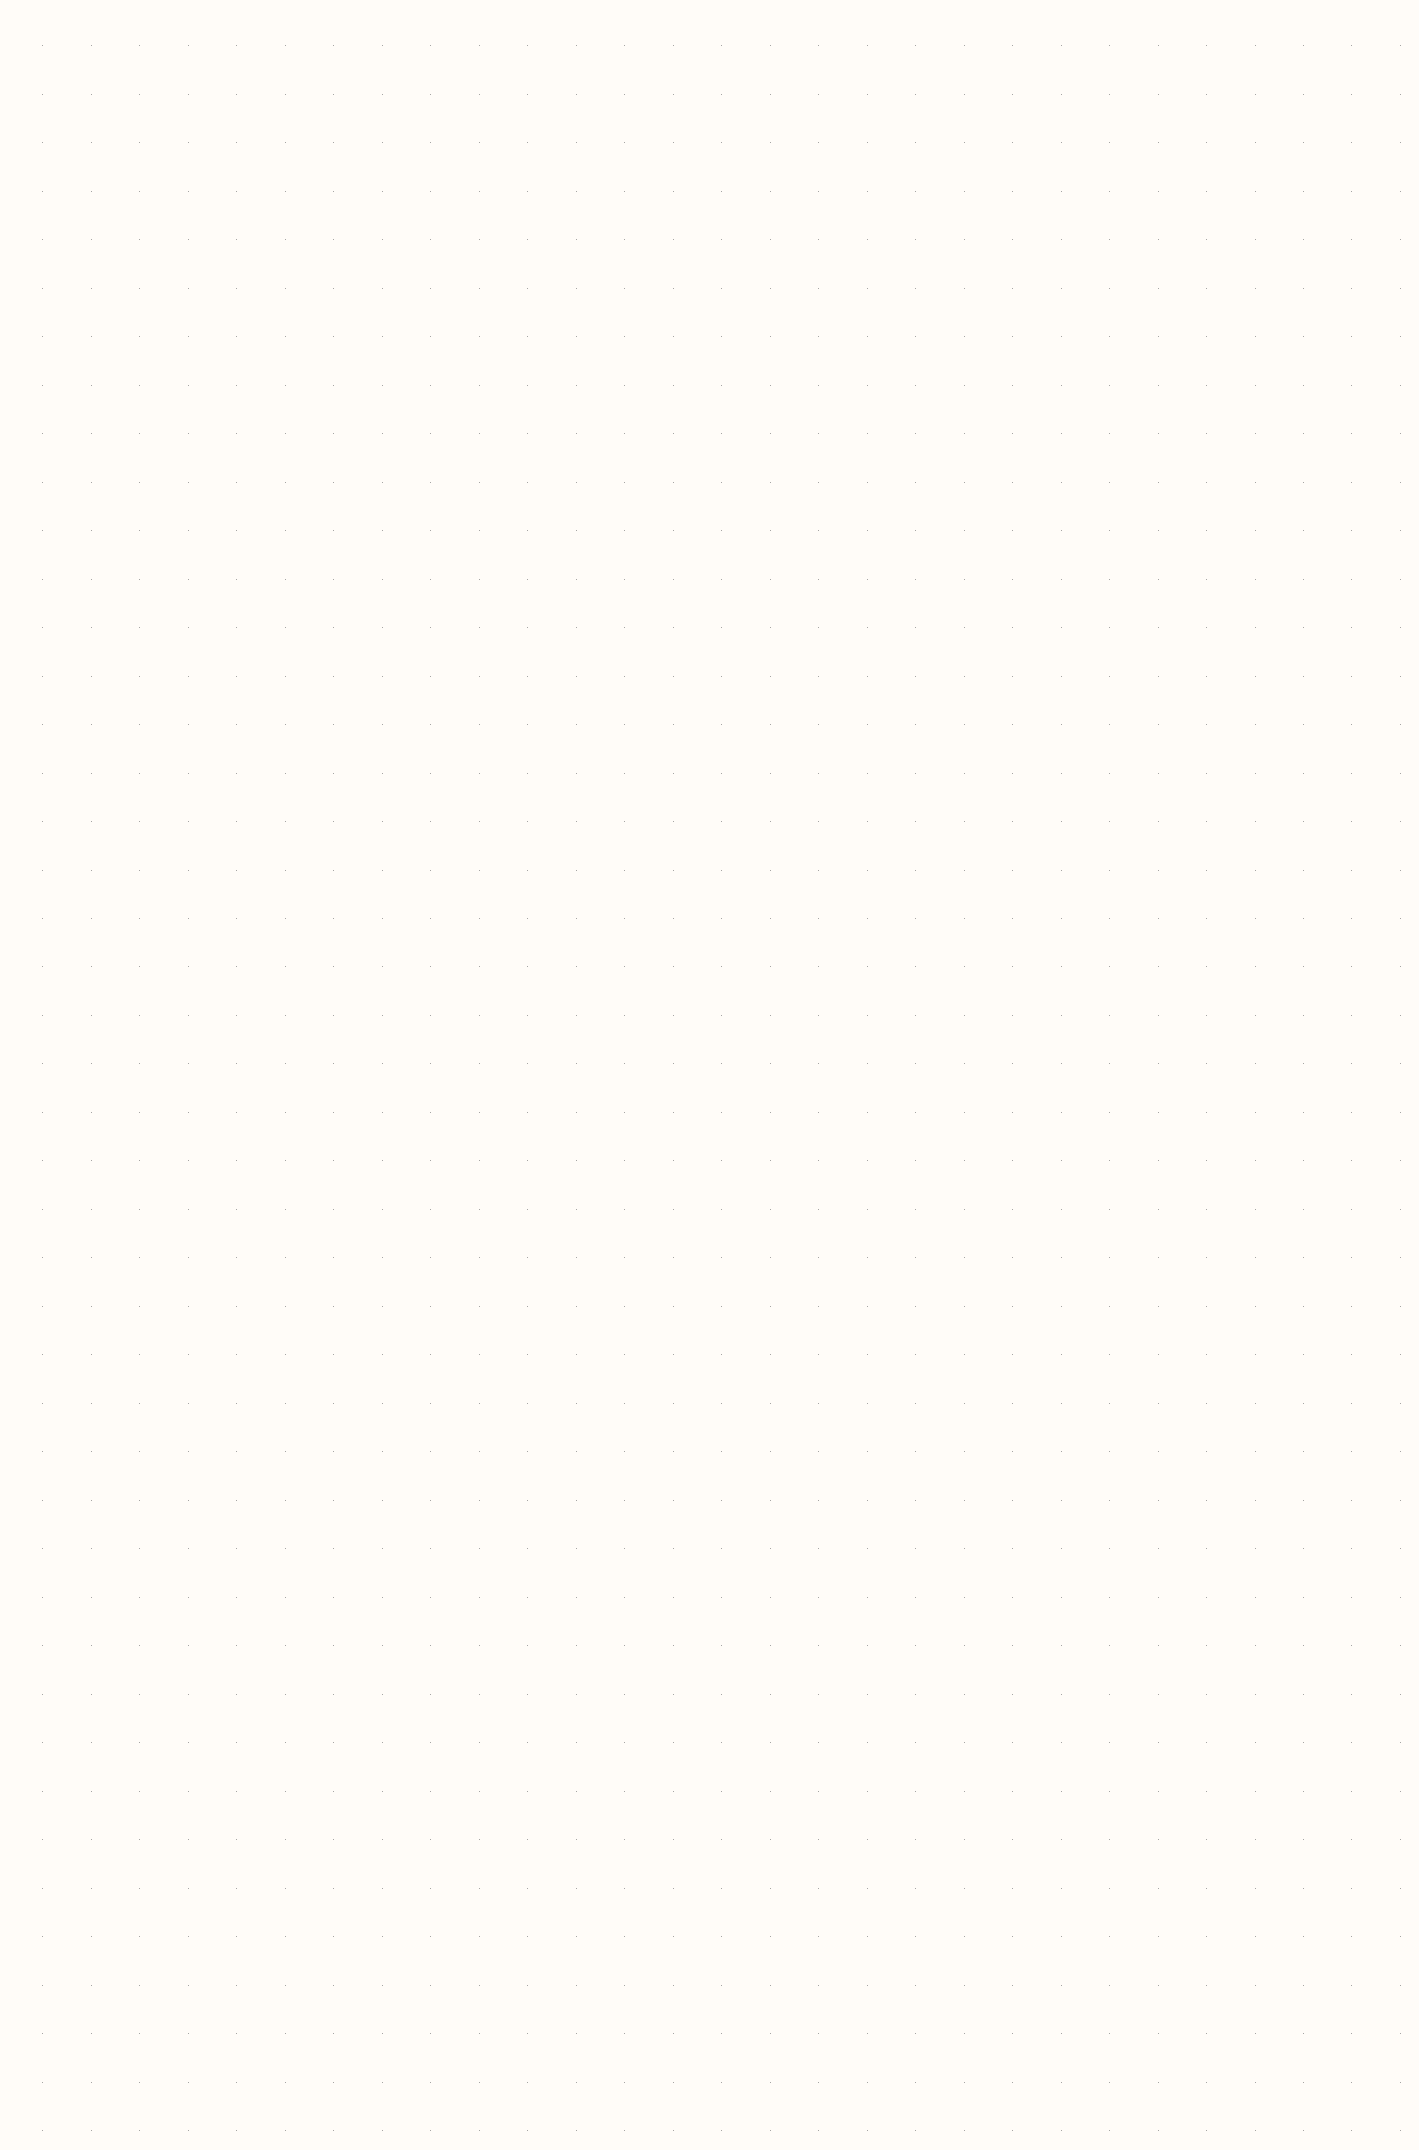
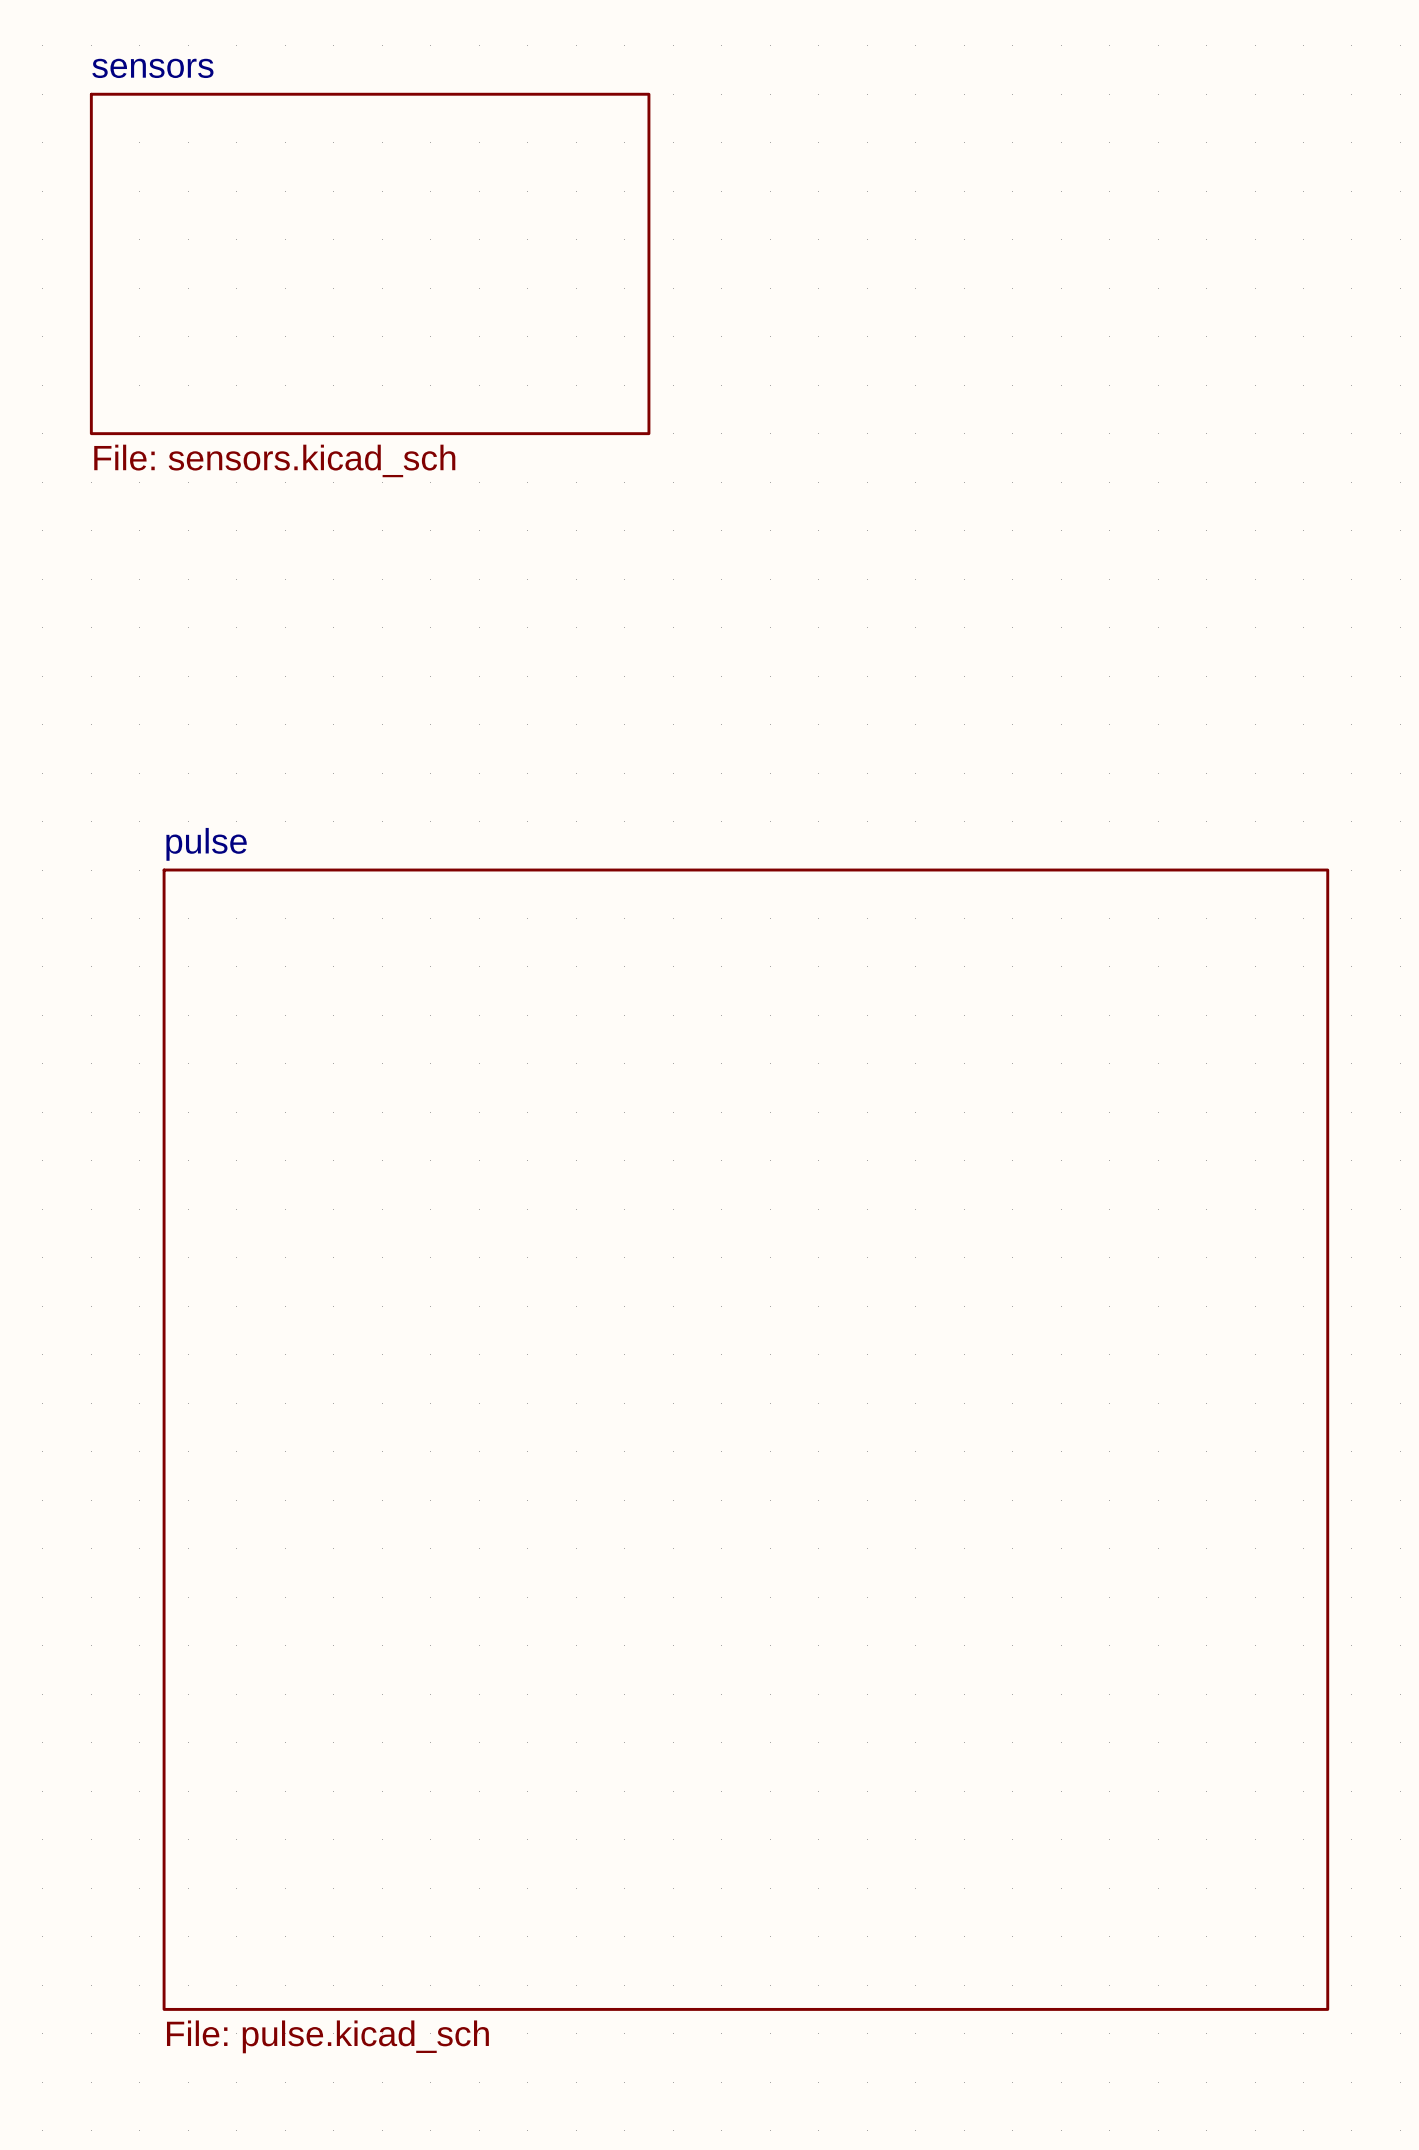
sheet sensors: none -> File: sensors.kicad_sch (370, 263)
sheet pulse: none -> File: pulse.kicad_sch (745, 1439)

